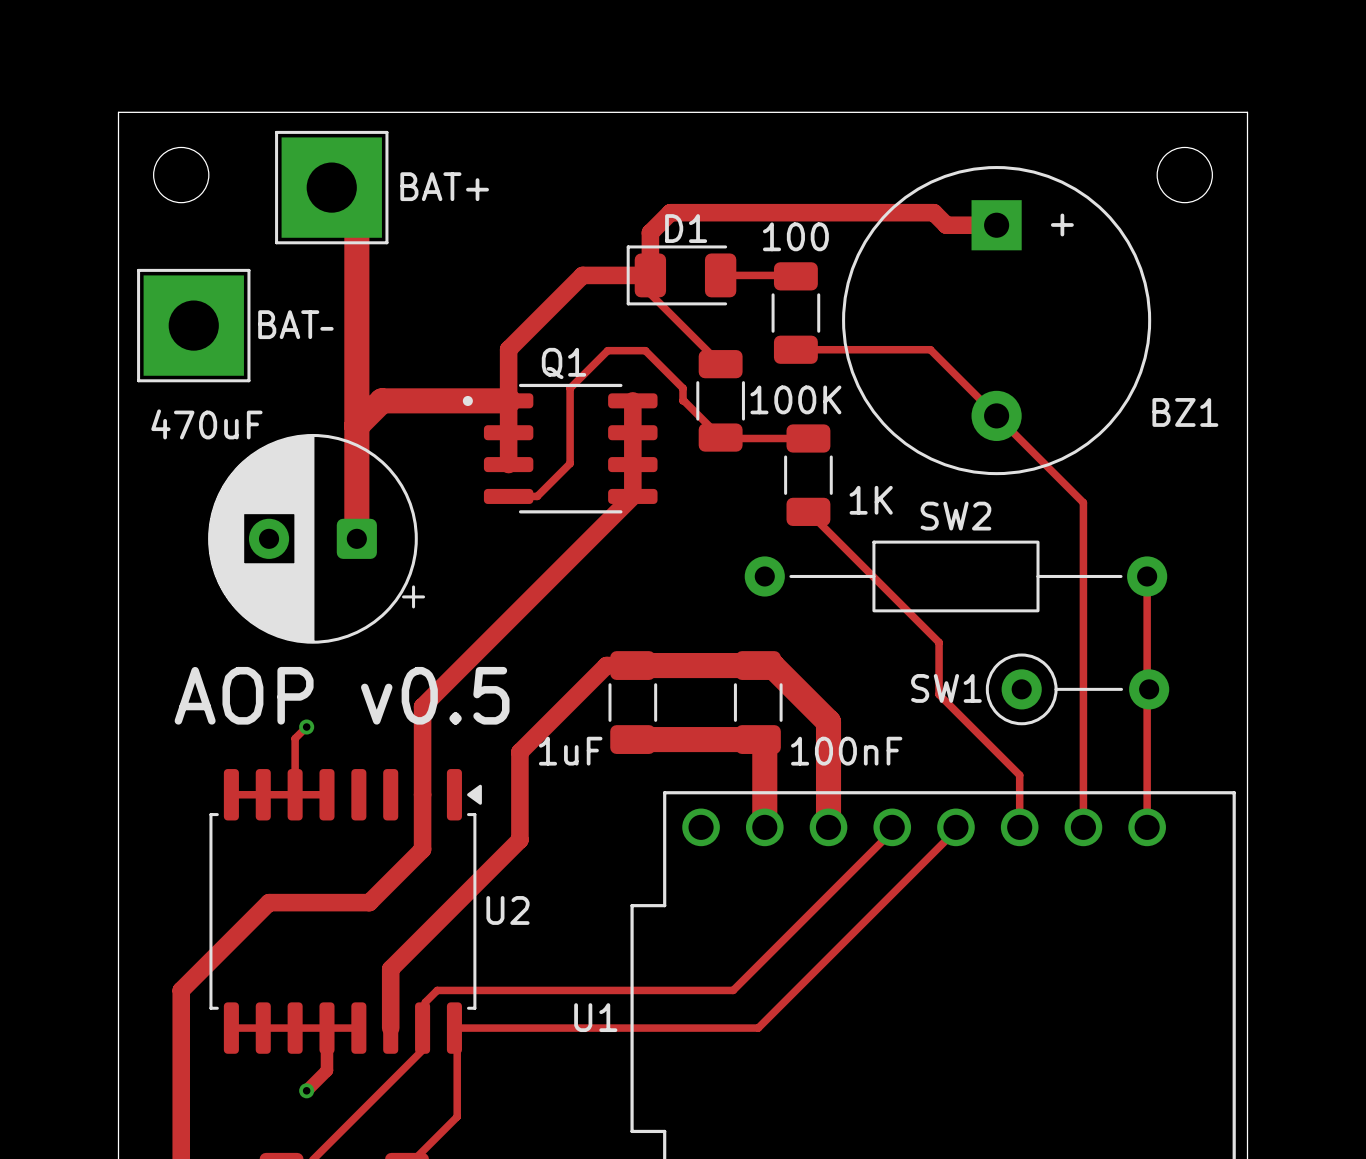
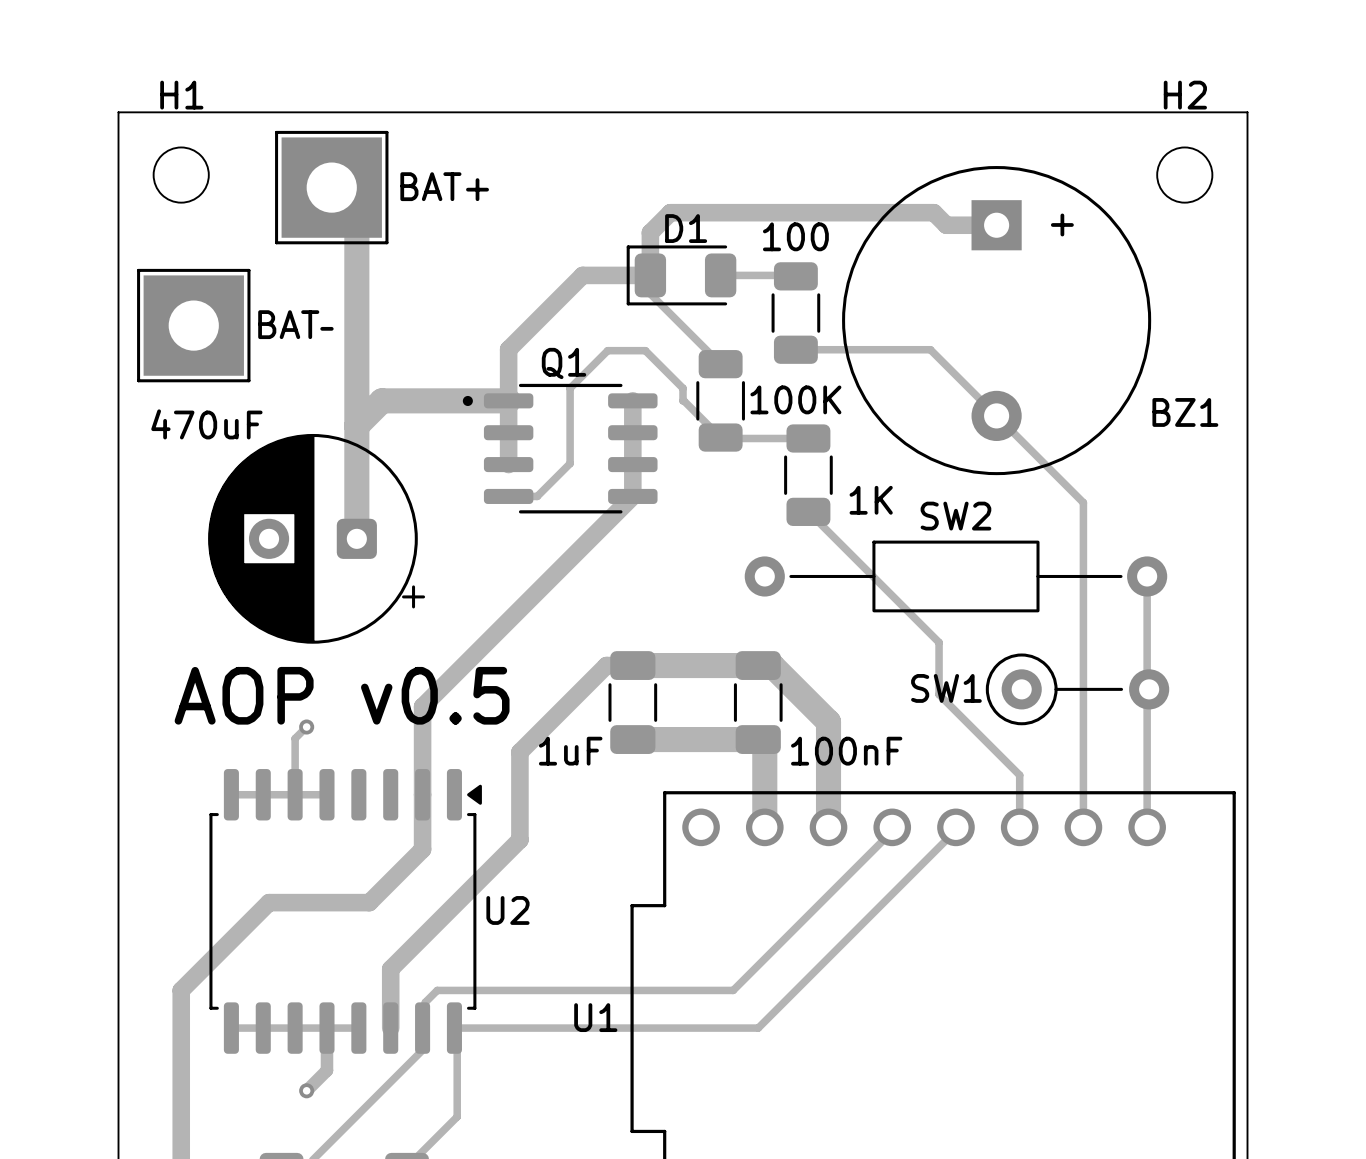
H1 name: none -> H1 (181, 95)
H2 name: none -> H2 (1185, 95)

